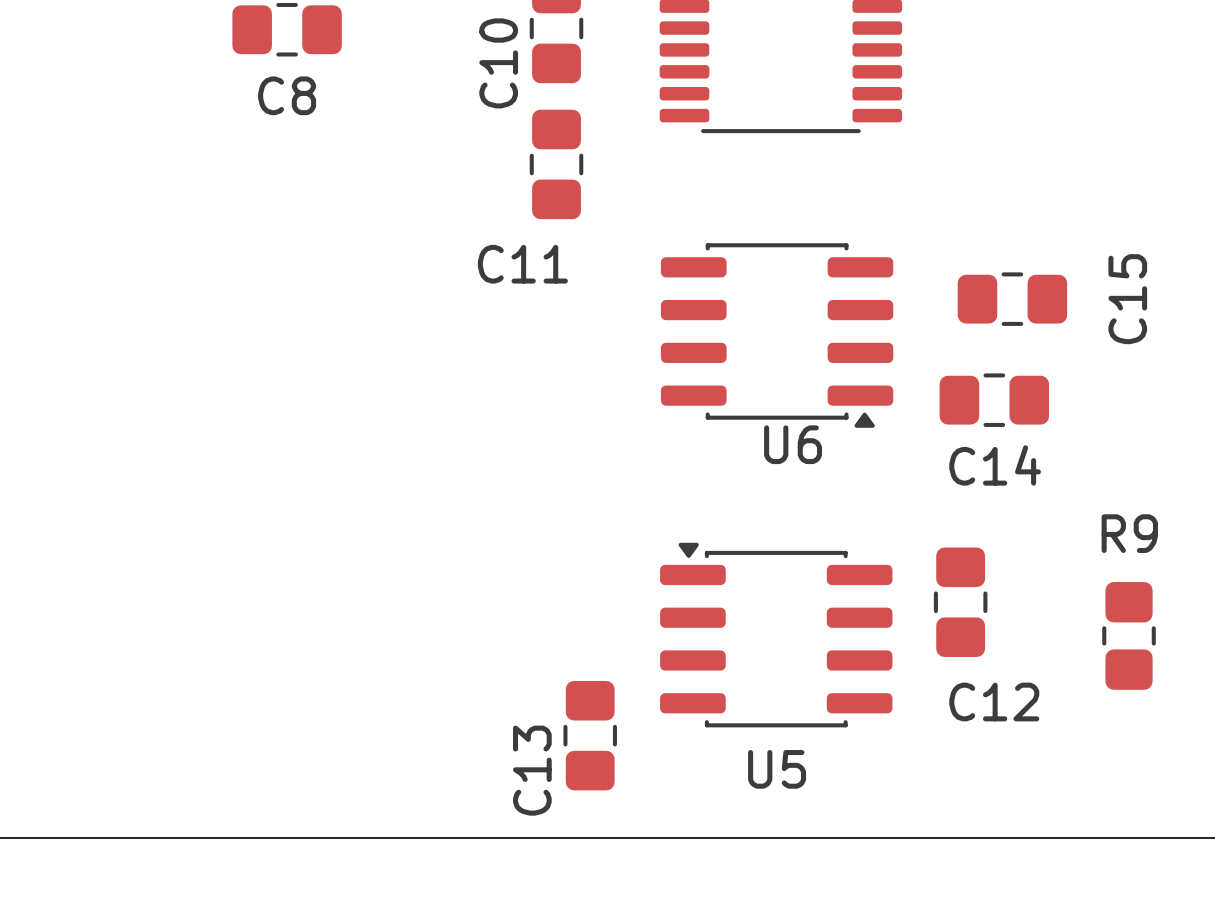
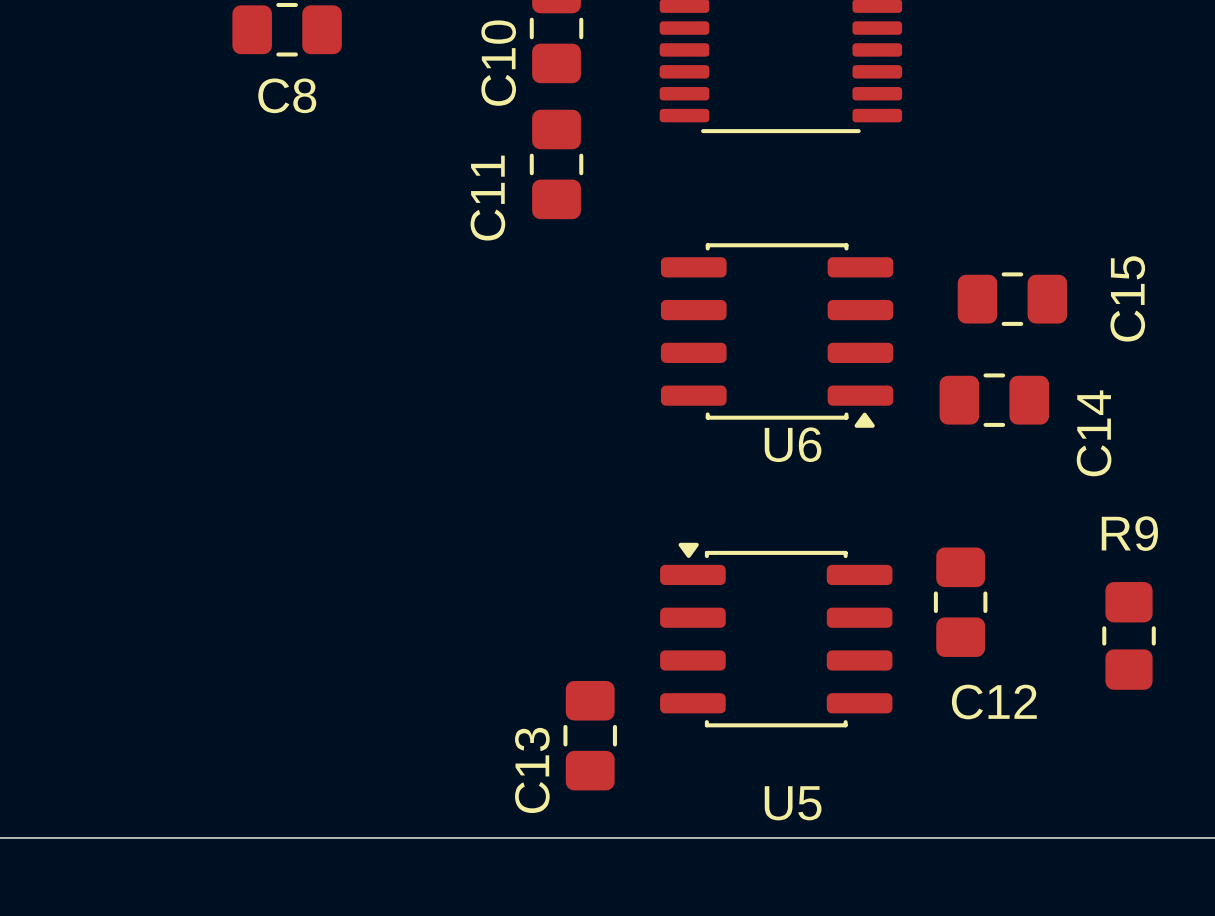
C11 name rotation: 0° (522, 264) -> 90° counterclockwise (487, 198)
C14 name rotation: 0° (995, 465) -> 90° counterclockwise (1094, 433)
U5 name position: U5 (777, 769) -> U5 (793, 803)

